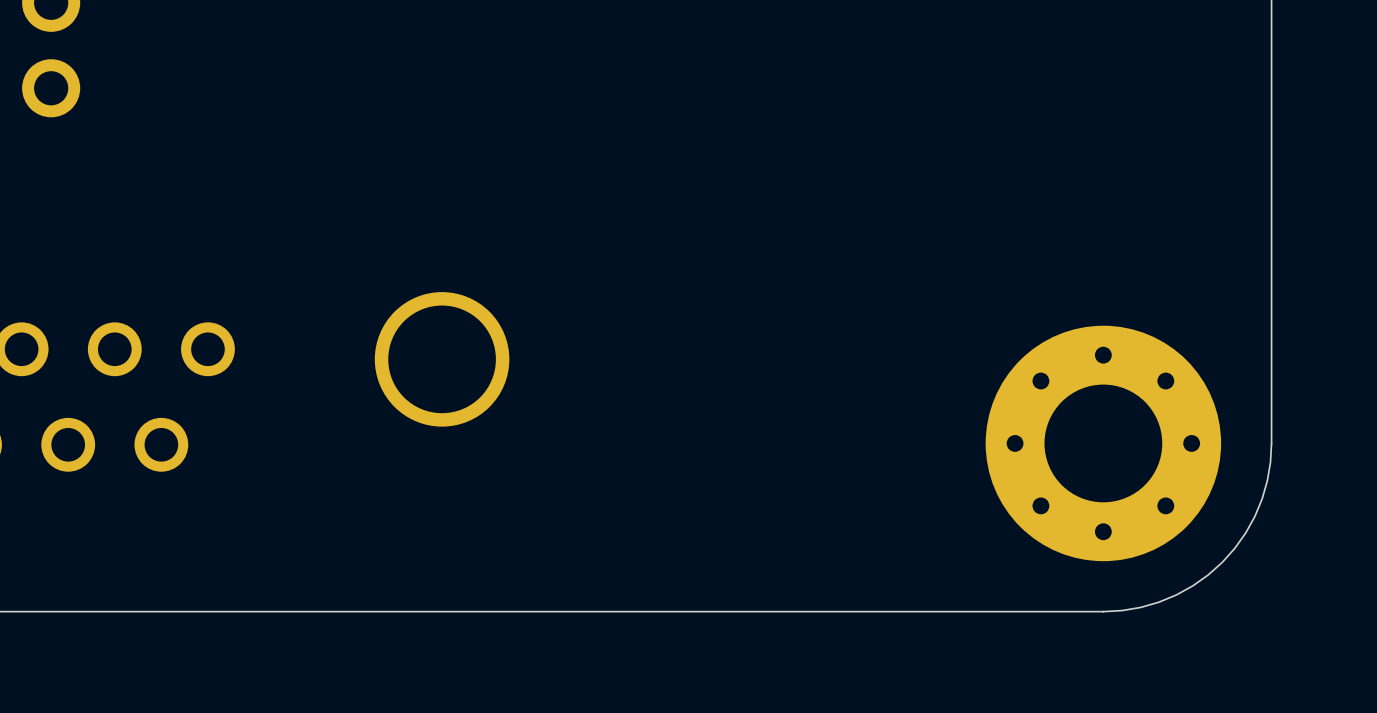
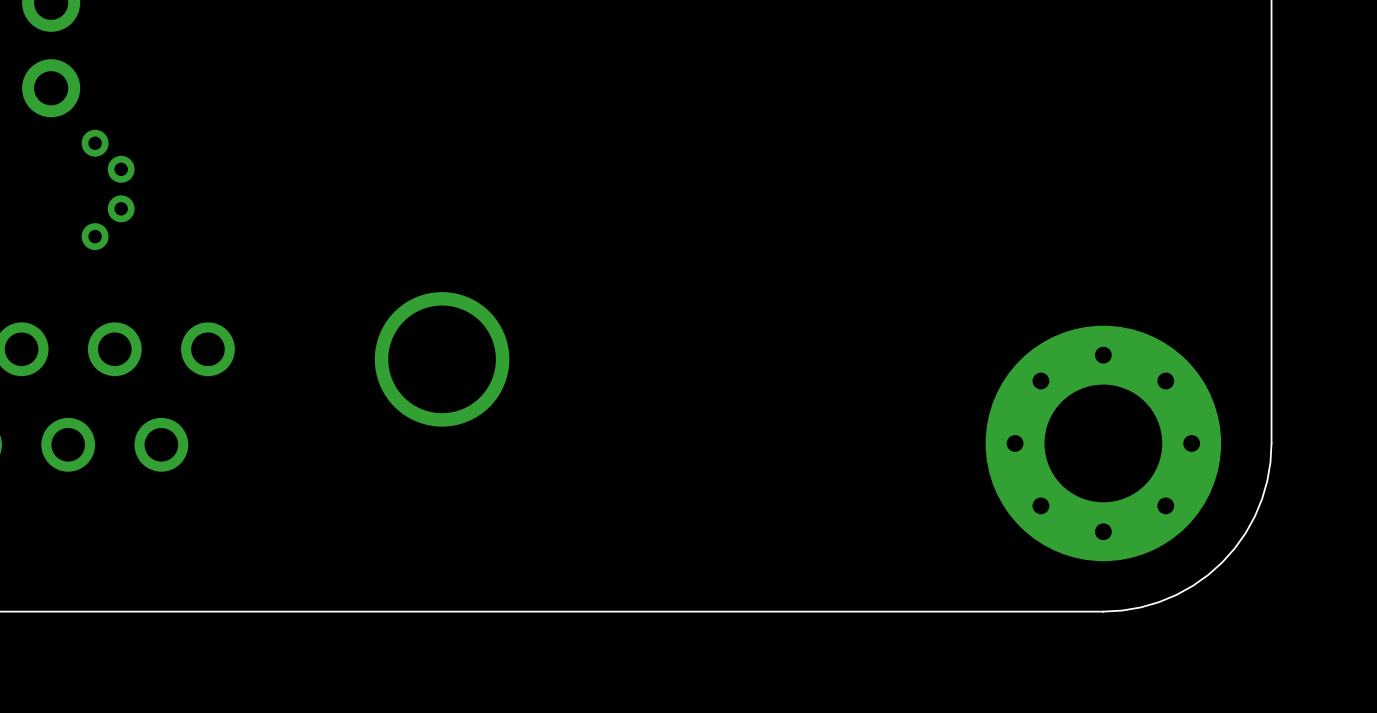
via: none -> (95, 143)
via: none -> (121, 169)
via: none -> (121, 208)
via: none -> (95, 236)

